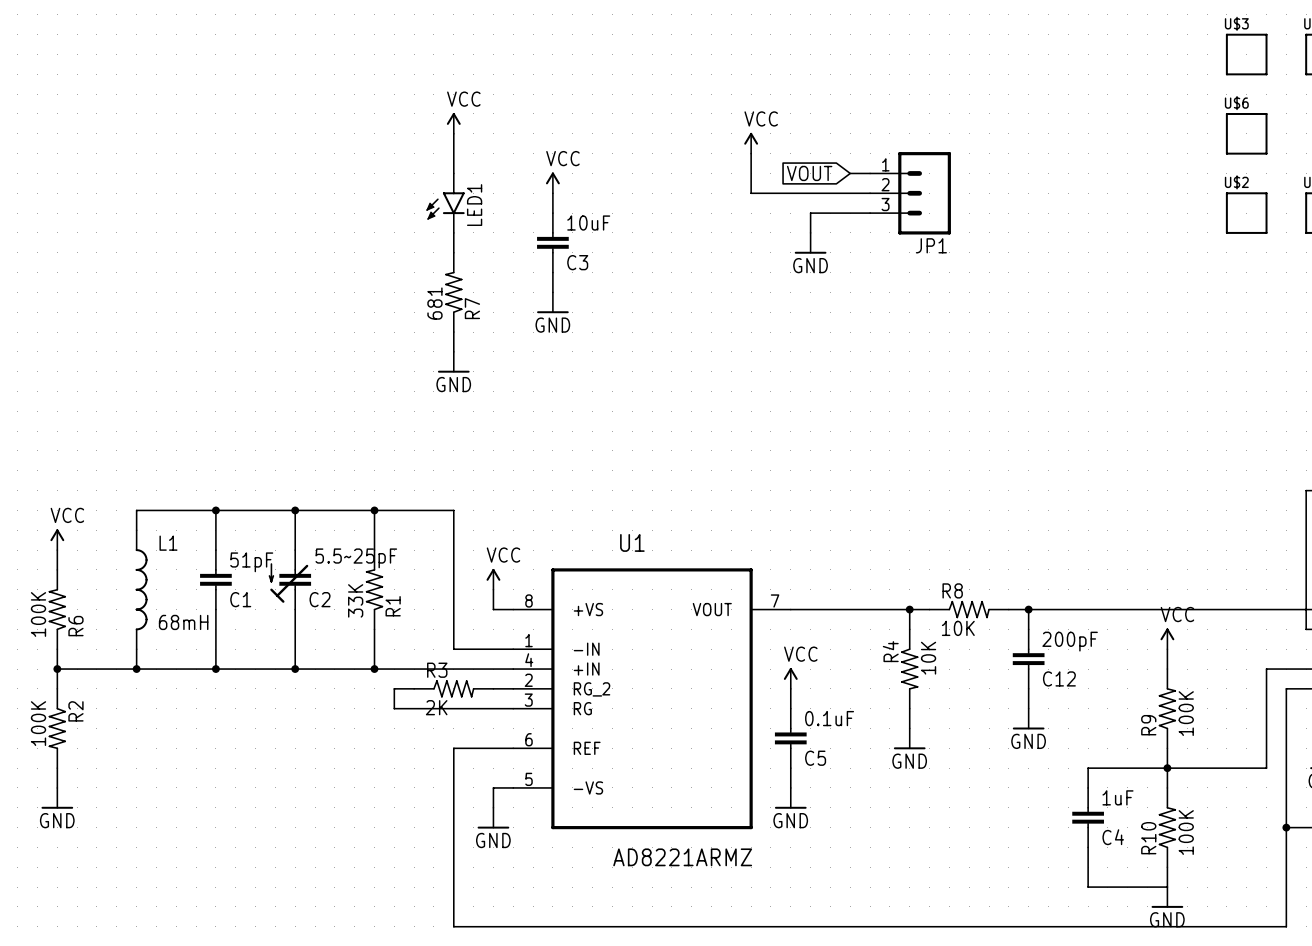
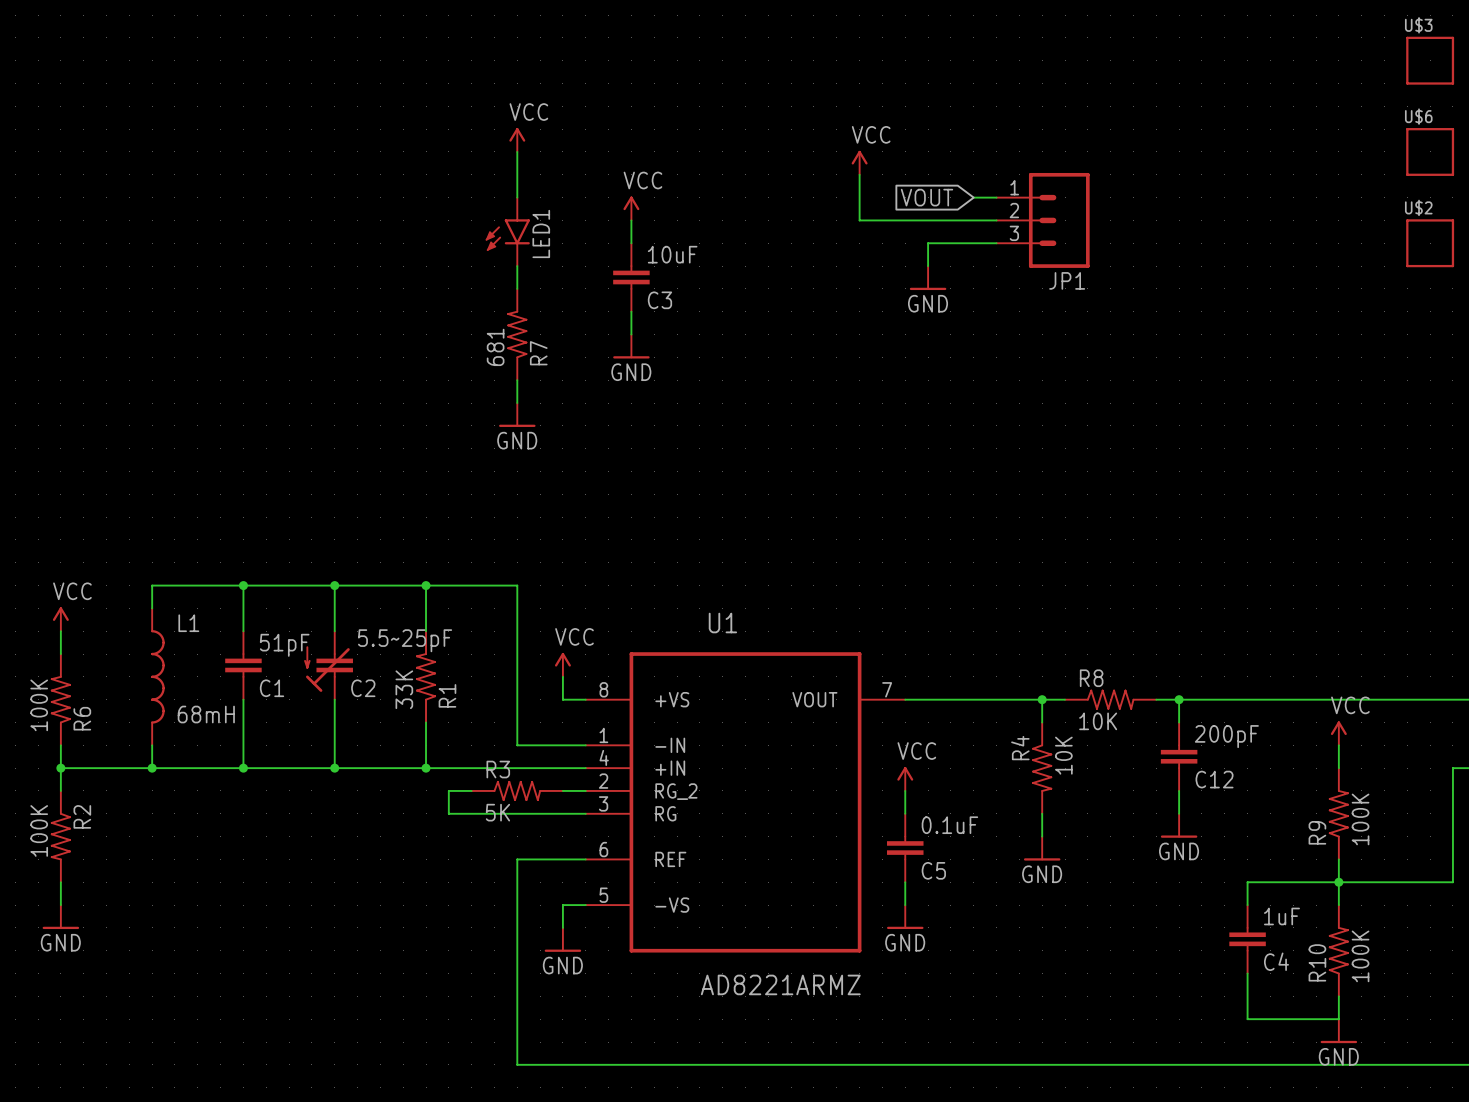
R3 value: 2K (436, 707) -> 5K (497, 812)

